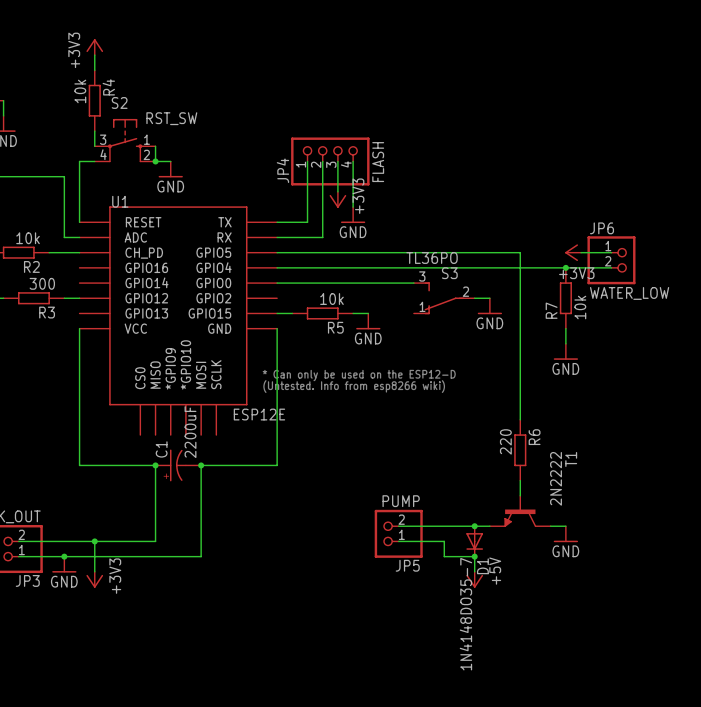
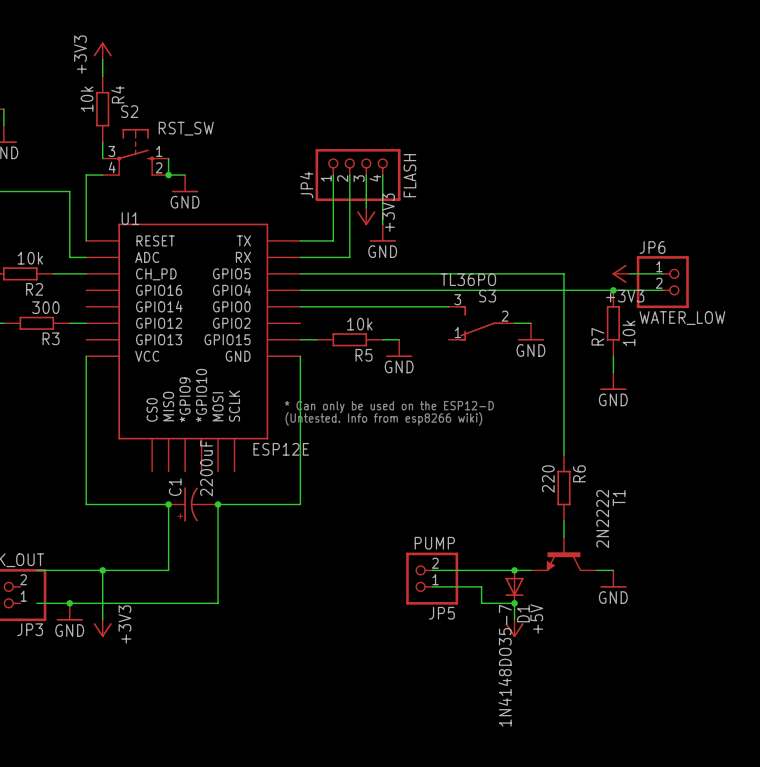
wire: none -> (102, 570) (102, 586)
wire: (155, 526) (155, 541) (18, 541) -> (168, 570) (36, 570)
junction position: (94, 541) -> (102, 570)
wire: (18, 556) (33, 556) -> none

